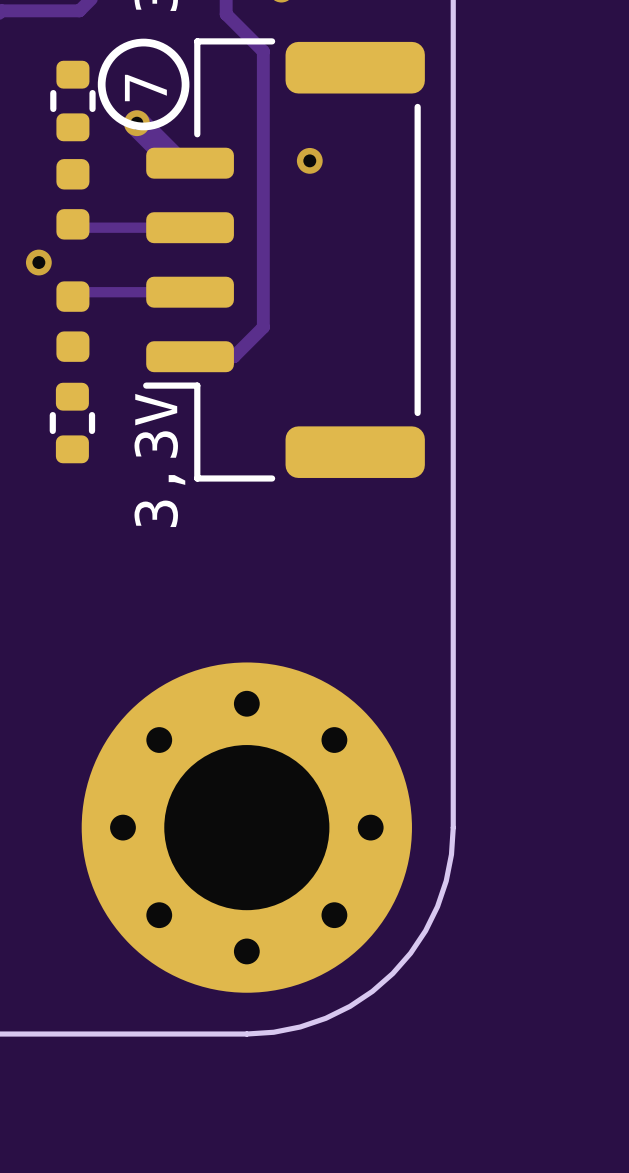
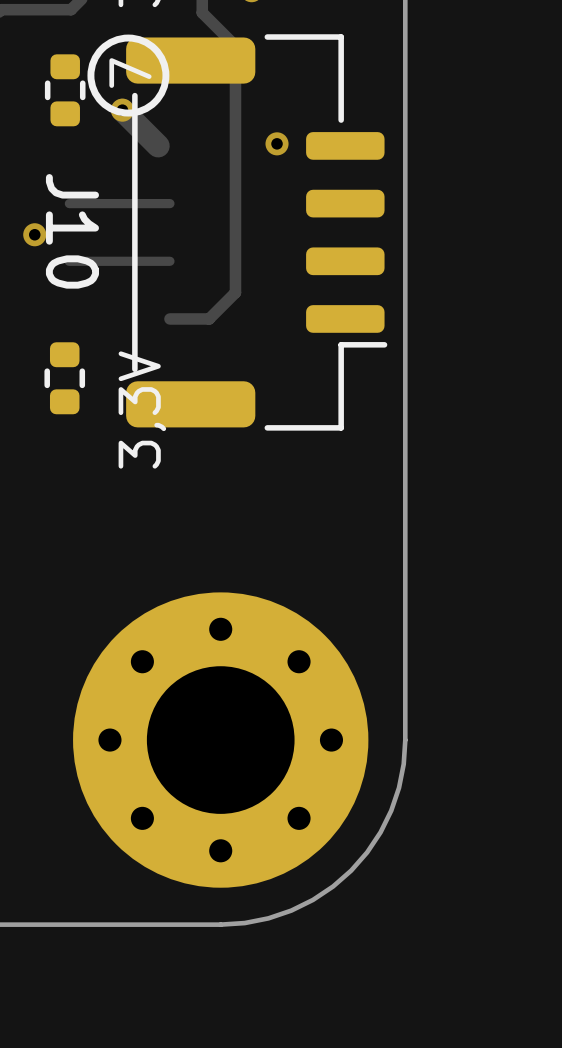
part: (72, 199) -> none
part: (283, 259) -> none
J10: none -> (256, 232)
part: (72, 321) -> none

